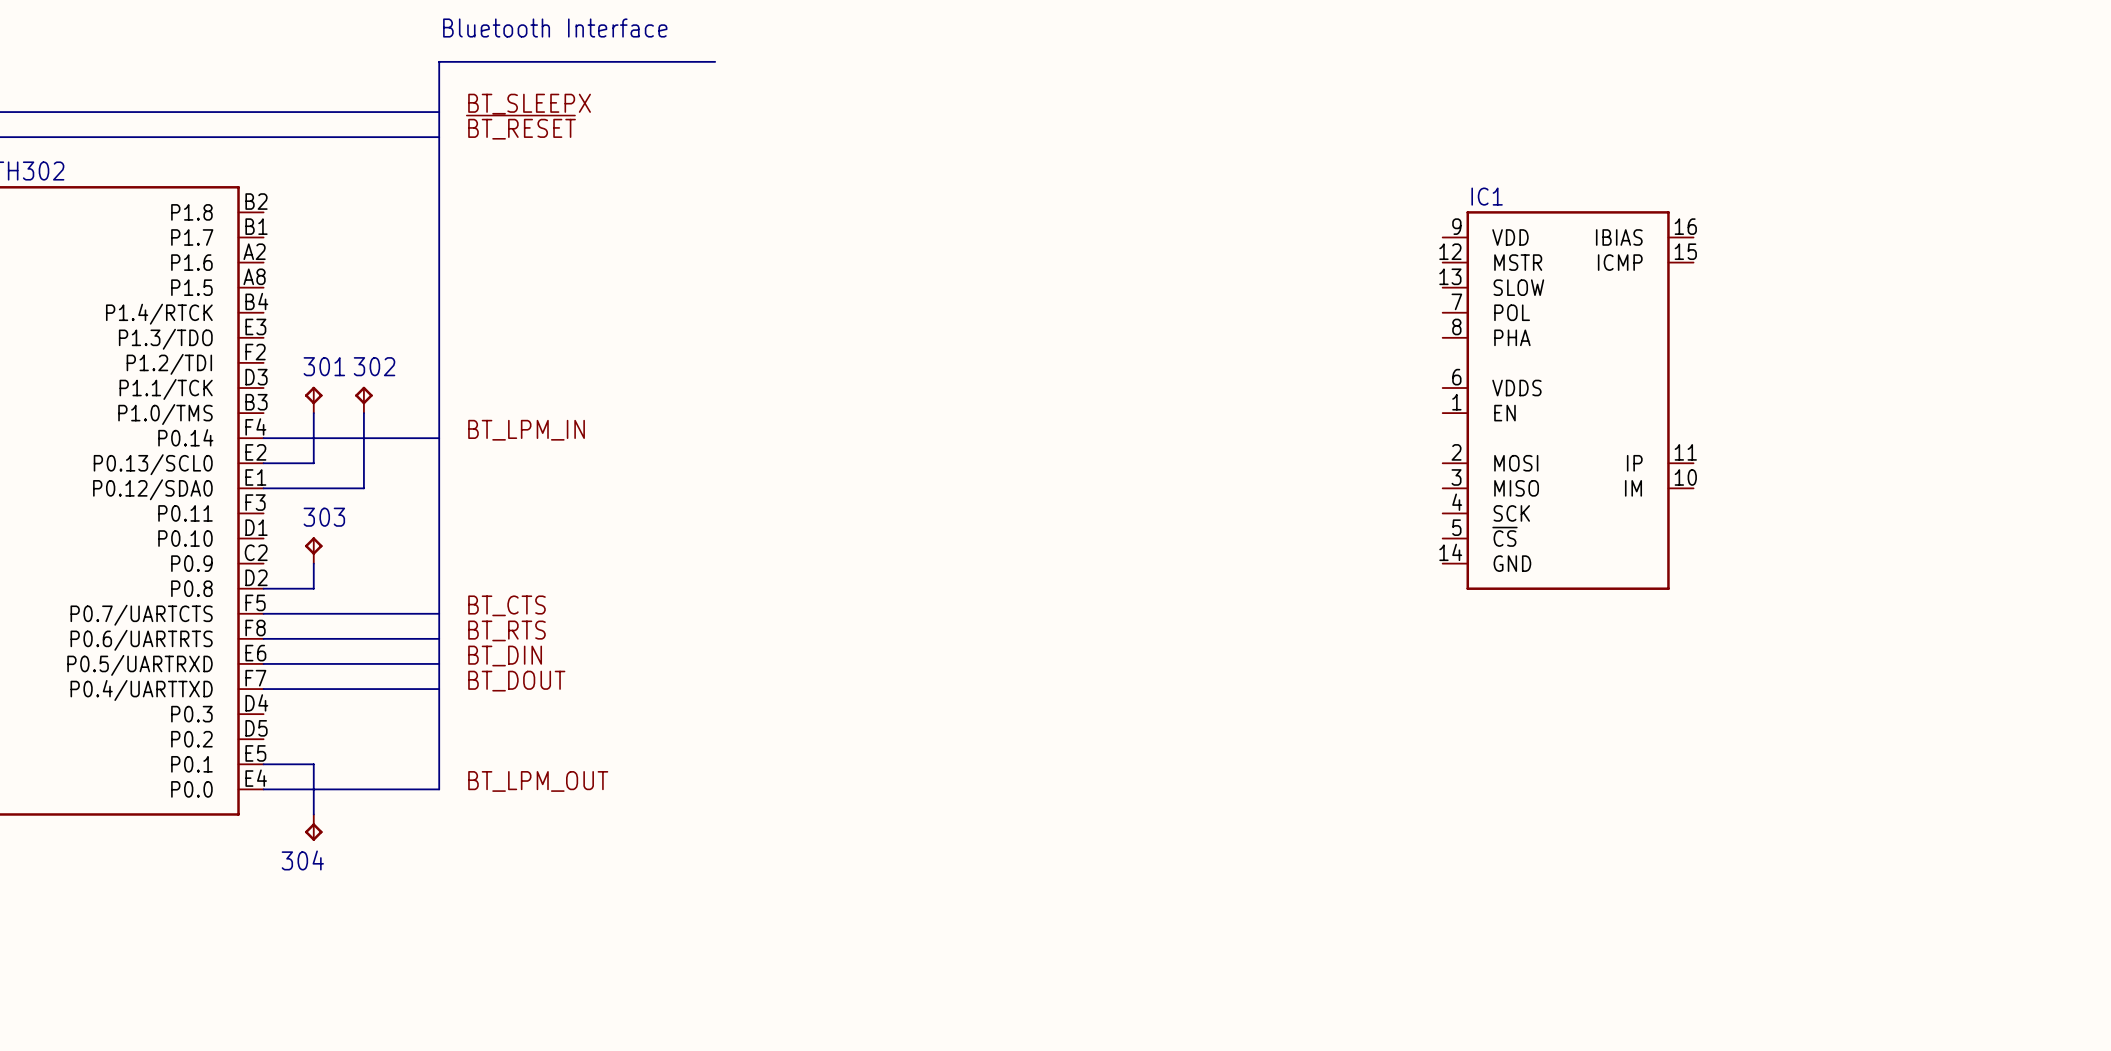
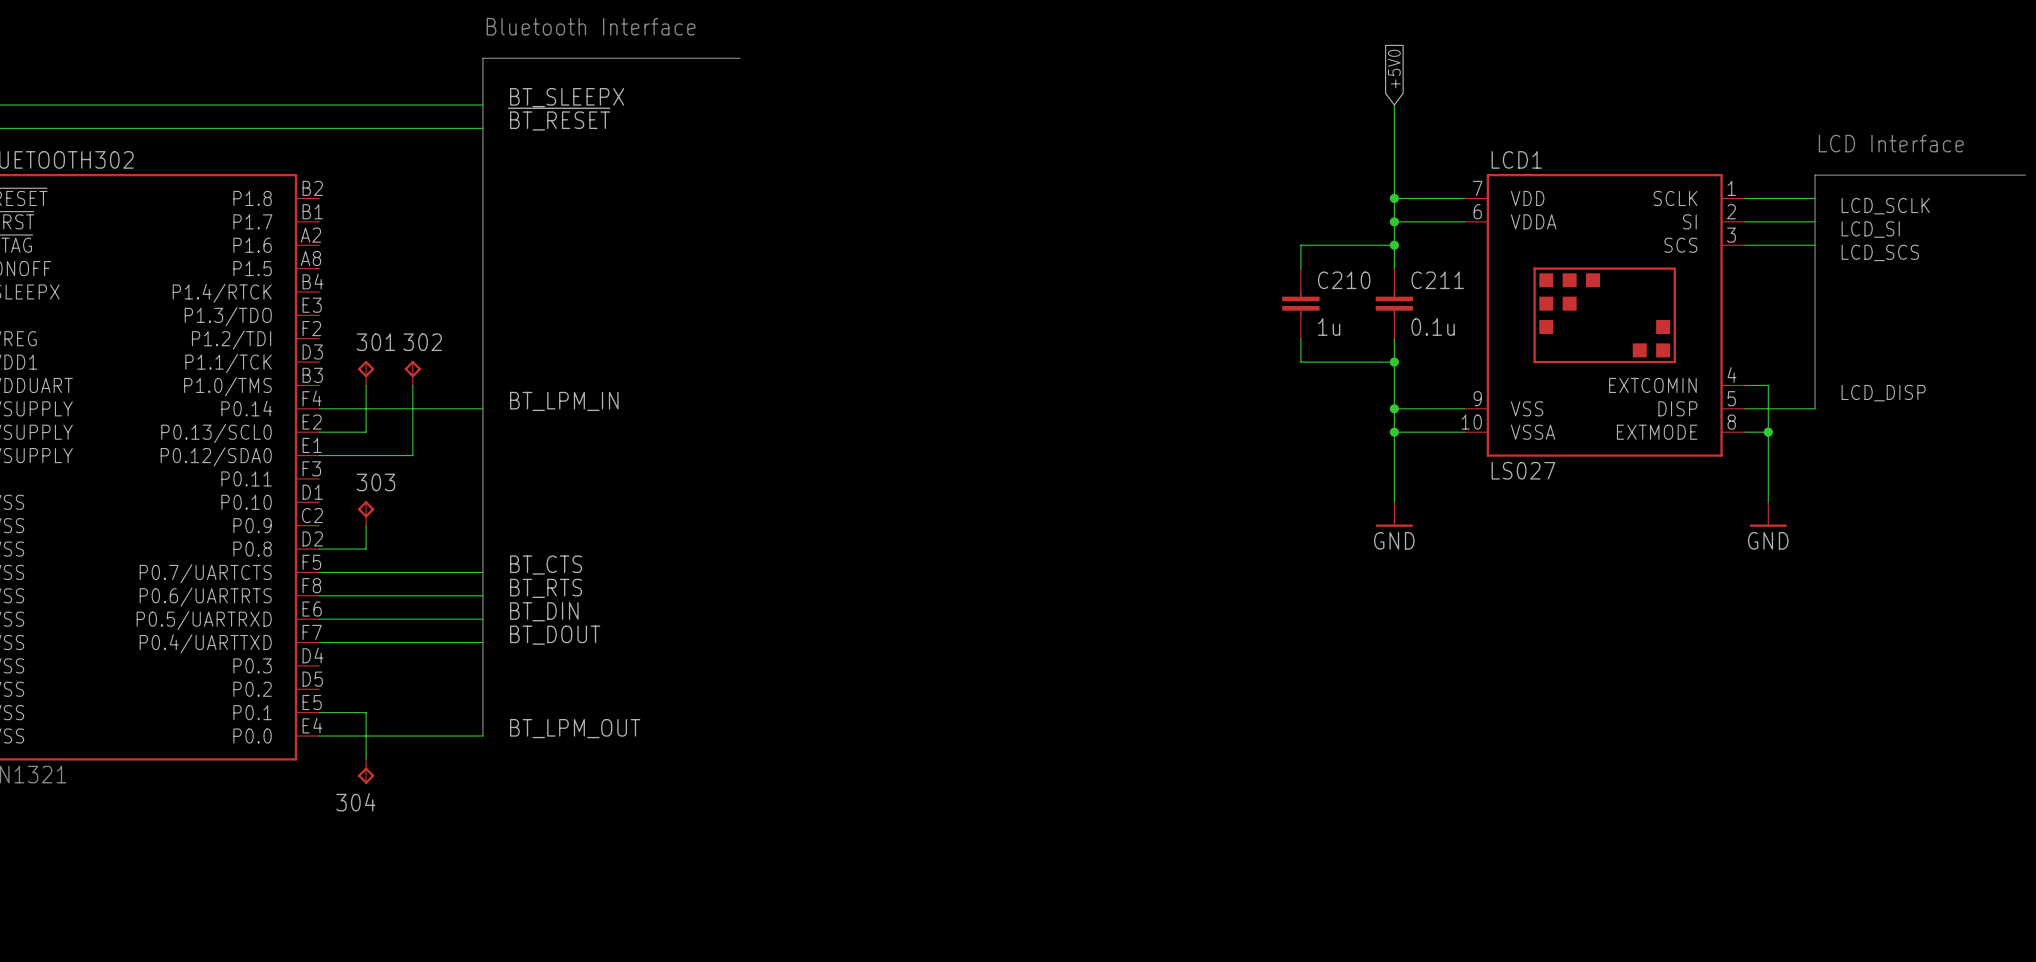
global label: none -> +5V0 (1394, 69)
wire: none -> (1394, 105) (1394, 268)
text: none -> LCD Interface (1891, 143)
bus: none -> (2025, 175) (1815, 175) (1815, 408)
wire: none -> (1394, 198) (1464, 198)
junction: none -> (1394, 198)
wire: none -> (1744, 198) (1815, 198)
label: none -> LCD_SCLK (1885, 206)
wire: none -> (1394, 221) (1464, 221)
junction: none -> (1394, 221)
wire: none -> (1744, 221) (1815, 221)
label: none -> LCD_SI (1870, 229)
wire: none -> (1394, 245) (1300, 245) (1300, 268)
junction: none -> (1394, 245)
wire: none -> (1744, 245) (1815, 245)
label: none -> LCD_SCS (1880, 252)
C210: none -> 1u (1300, 303)
C211: none -> 0.1u (1394, 303)
LCD1: none -> LS027 (1604, 315)
wire: none -> (1300, 338) (1300, 362) (1394, 362)
wire: none -> (1394, 338) (1394, 502)
junction: none -> (1394, 362)
IC1: (1568, 400) -> none
wire: none -> (1744, 385) (1768, 385) (1768, 502)
label: none -> LCD_DISP (1883, 393)
wire: none -> (1394, 408) (1464, 408)
junction: none -> (1394, 408)
wire: none -> (1744, 408) (1815, 408)
wire: none -> (1394, 432) (1464, 432)
junction: none -> (1394, 432)
wire: none -> (1744, 432) (1768, 432)
junction: none -> (1768, 432)
power symbol: none -> GND (1394, 514)
power symbol: none -> GND (1768, 514)

